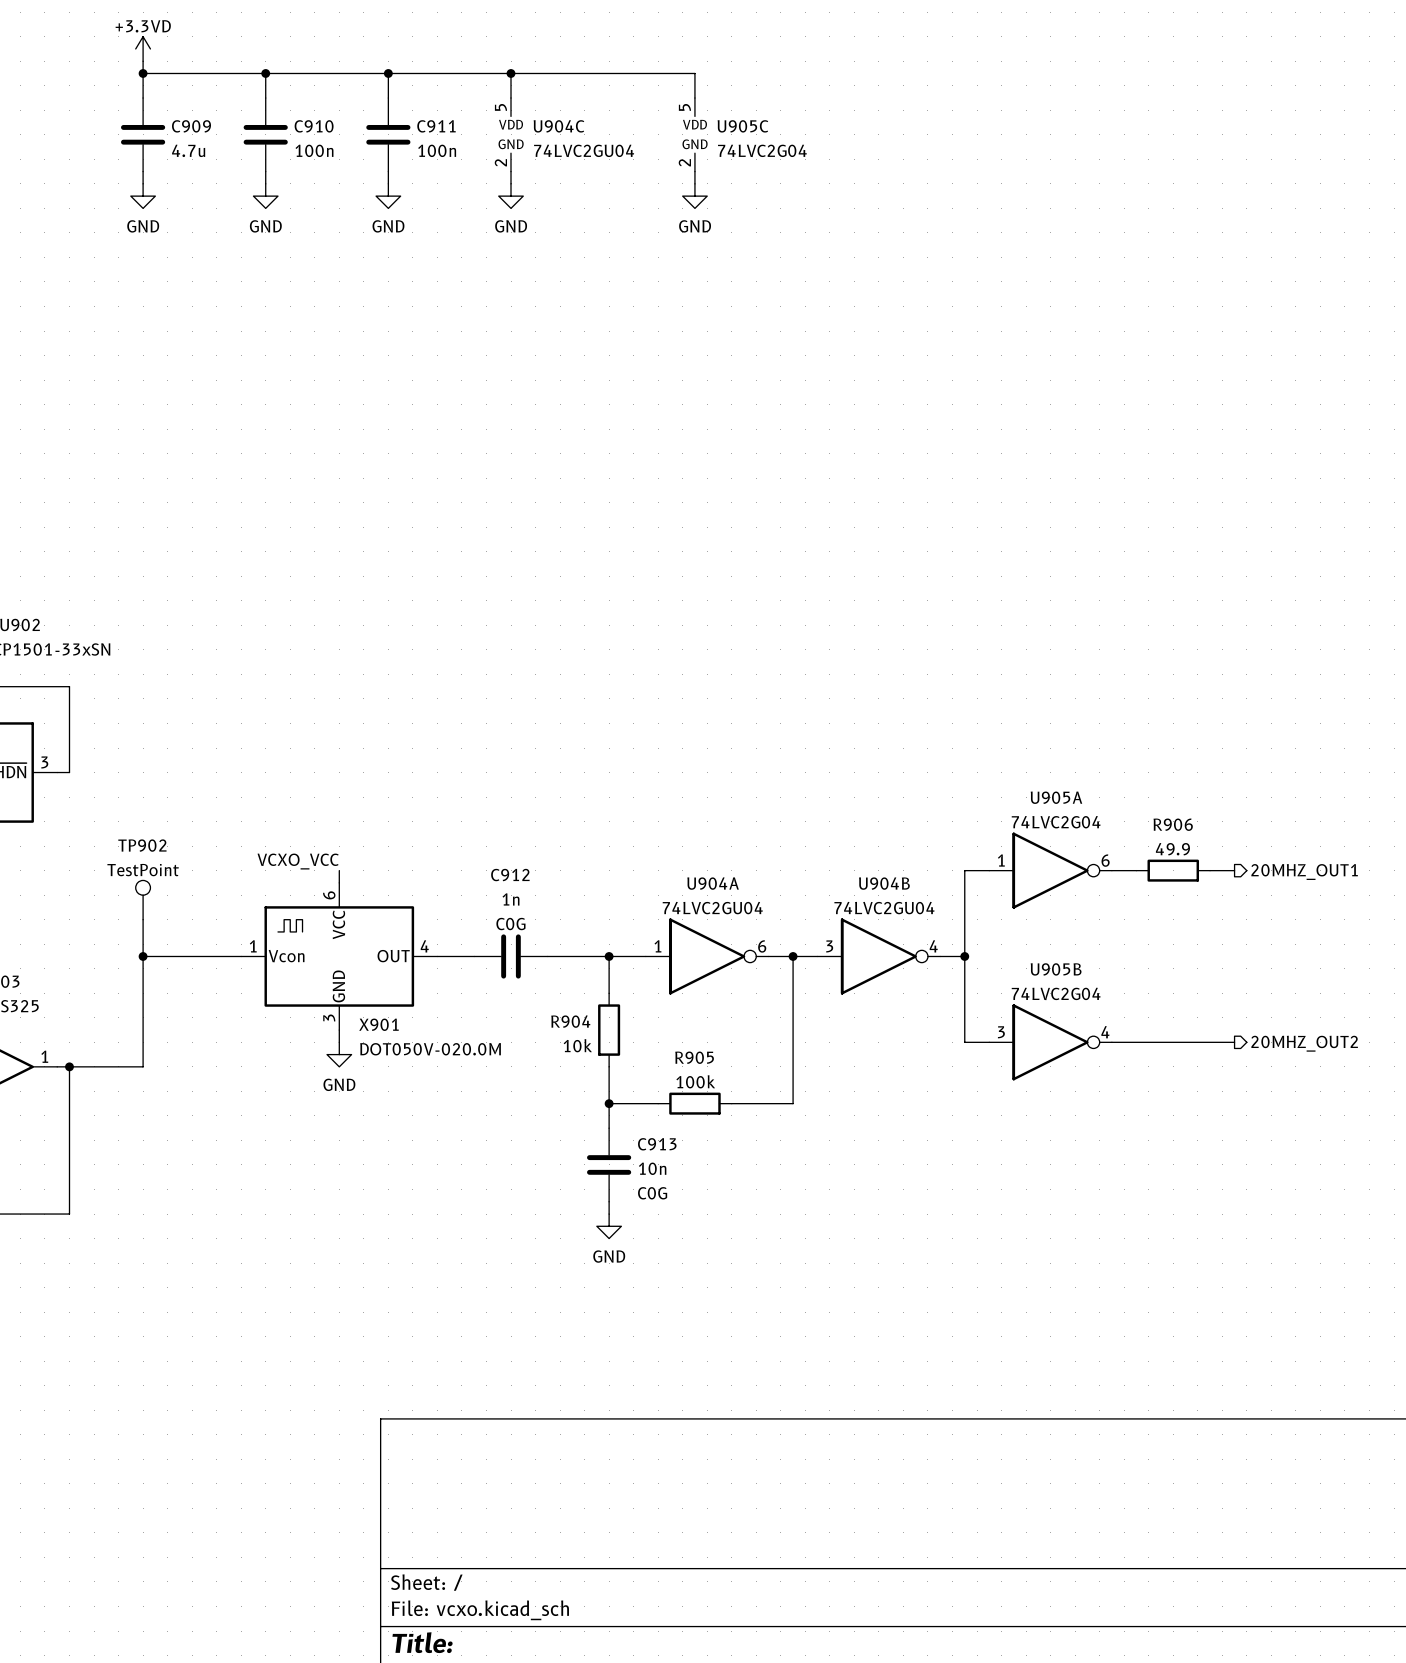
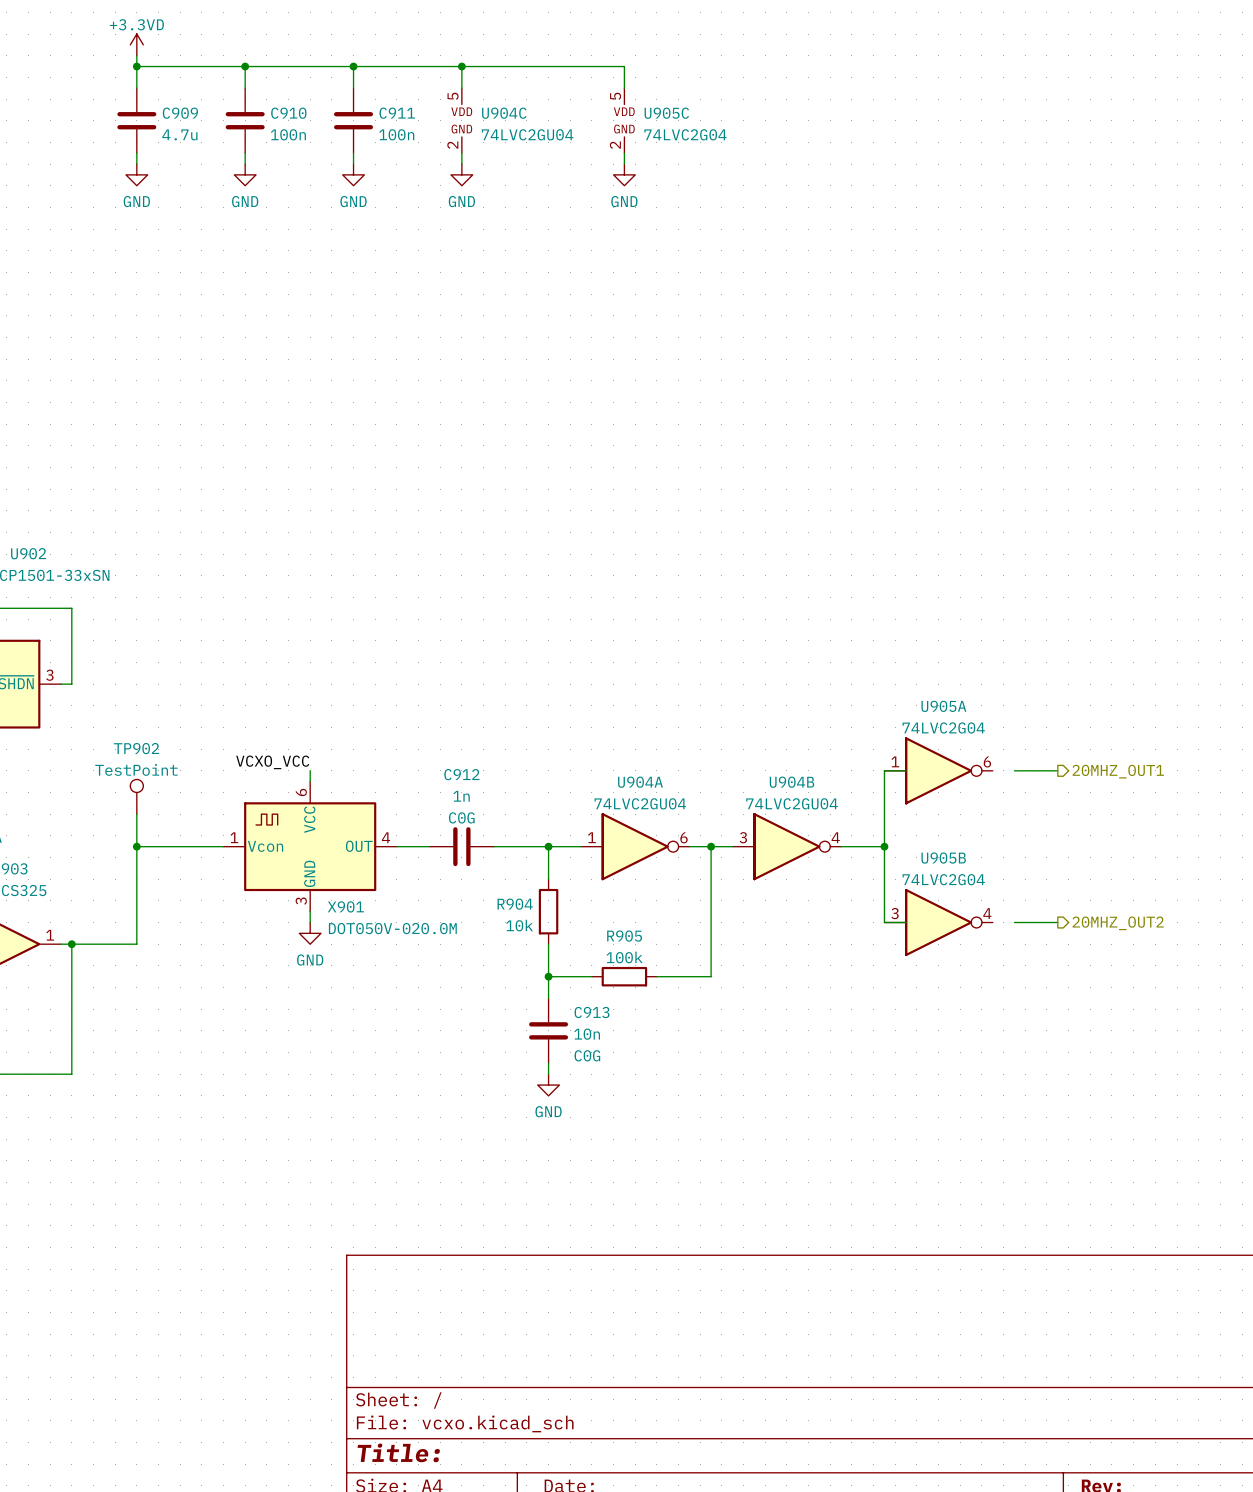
wire: (989, 870) (964, 870) (964, 1042) (989, 1042) -> (906, 770) (884, 770) (884, 922) (906, 922)
wire: (1111, 870) (1136, 870) -> (1057, 770) (1014, 770)
R906: 49.9 (1173, 870) -> none
wire: (1210, 870) (1234, 870) -> none
hierarchical label position: 20MHZ_OUT1 (1304, 872) -> 20MHZ_OUT1 (1118, 771)
junction position: (964, 956) -> (884, 846)
wire: (1111, 1042) (1136, 1042) -> (862, 846) (884, 846)
wire: (1185, 1042) (1234, 1042) -> none
hierarchical label position: 20MHZ_OUT2 (1304, 1043) -> 20MHZ_OUT2 (1118, 923)

